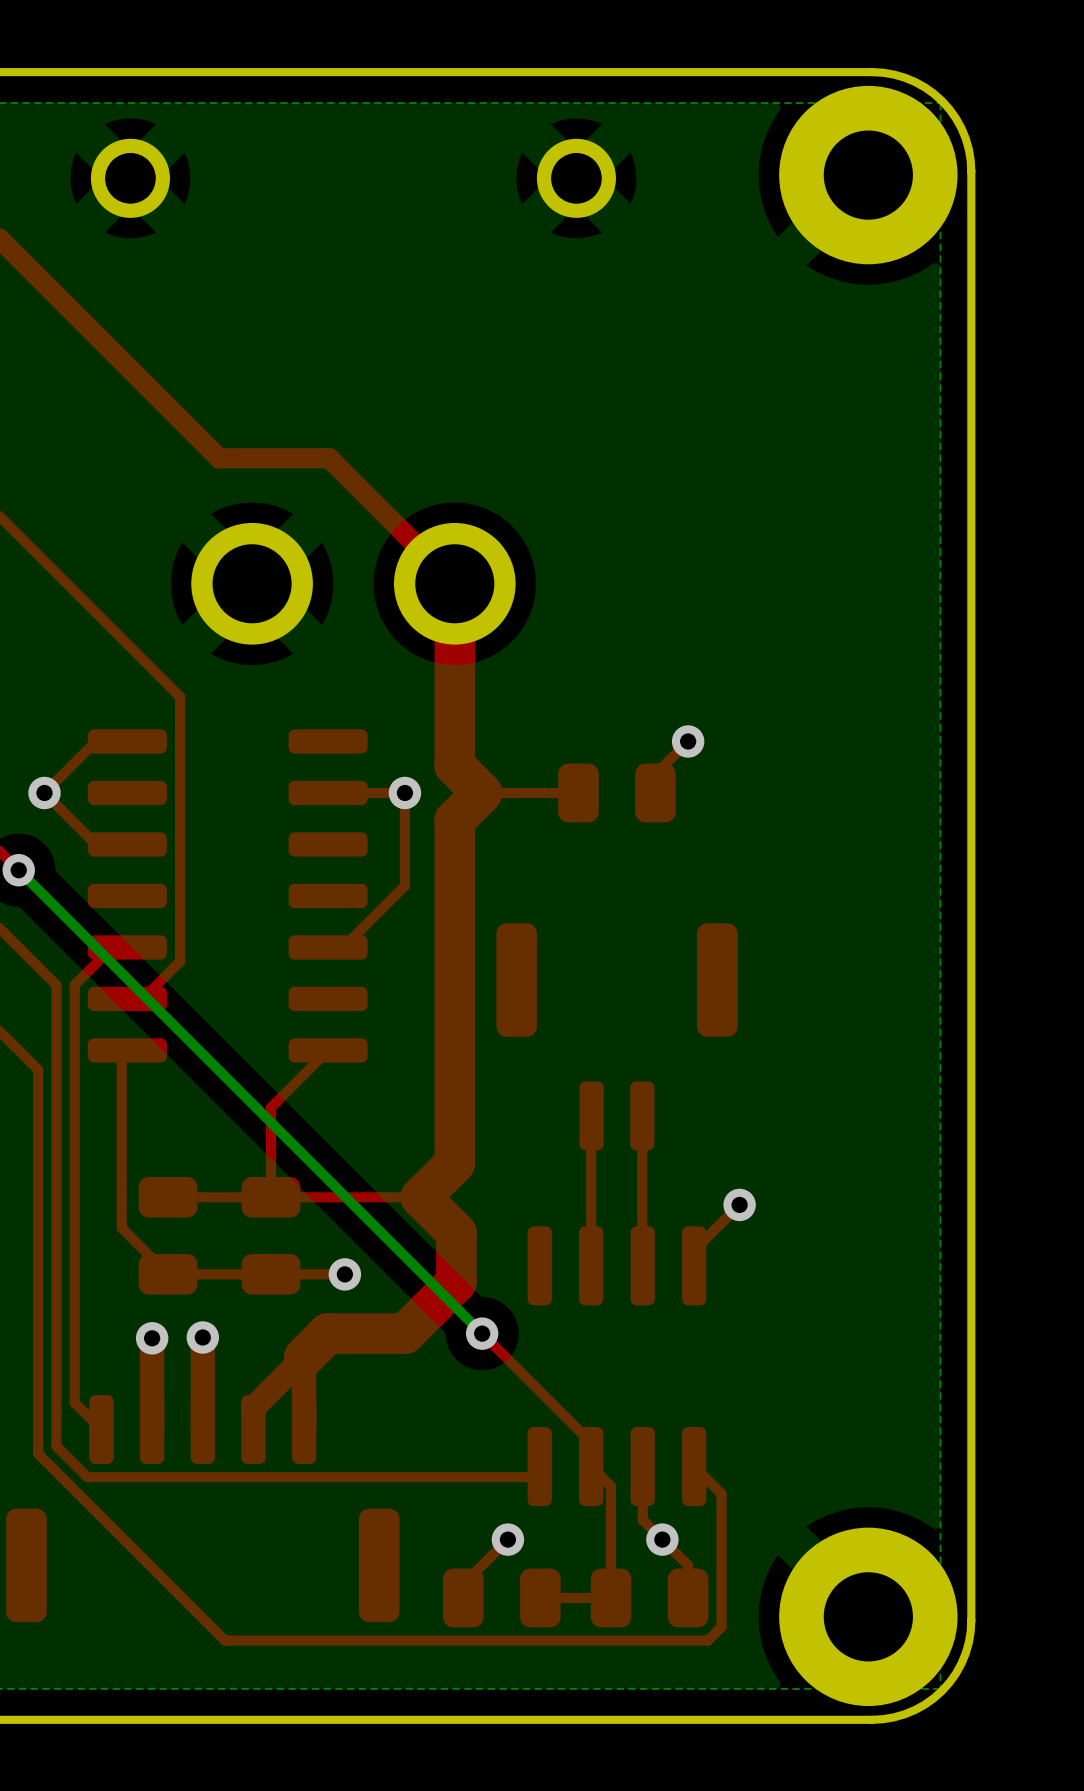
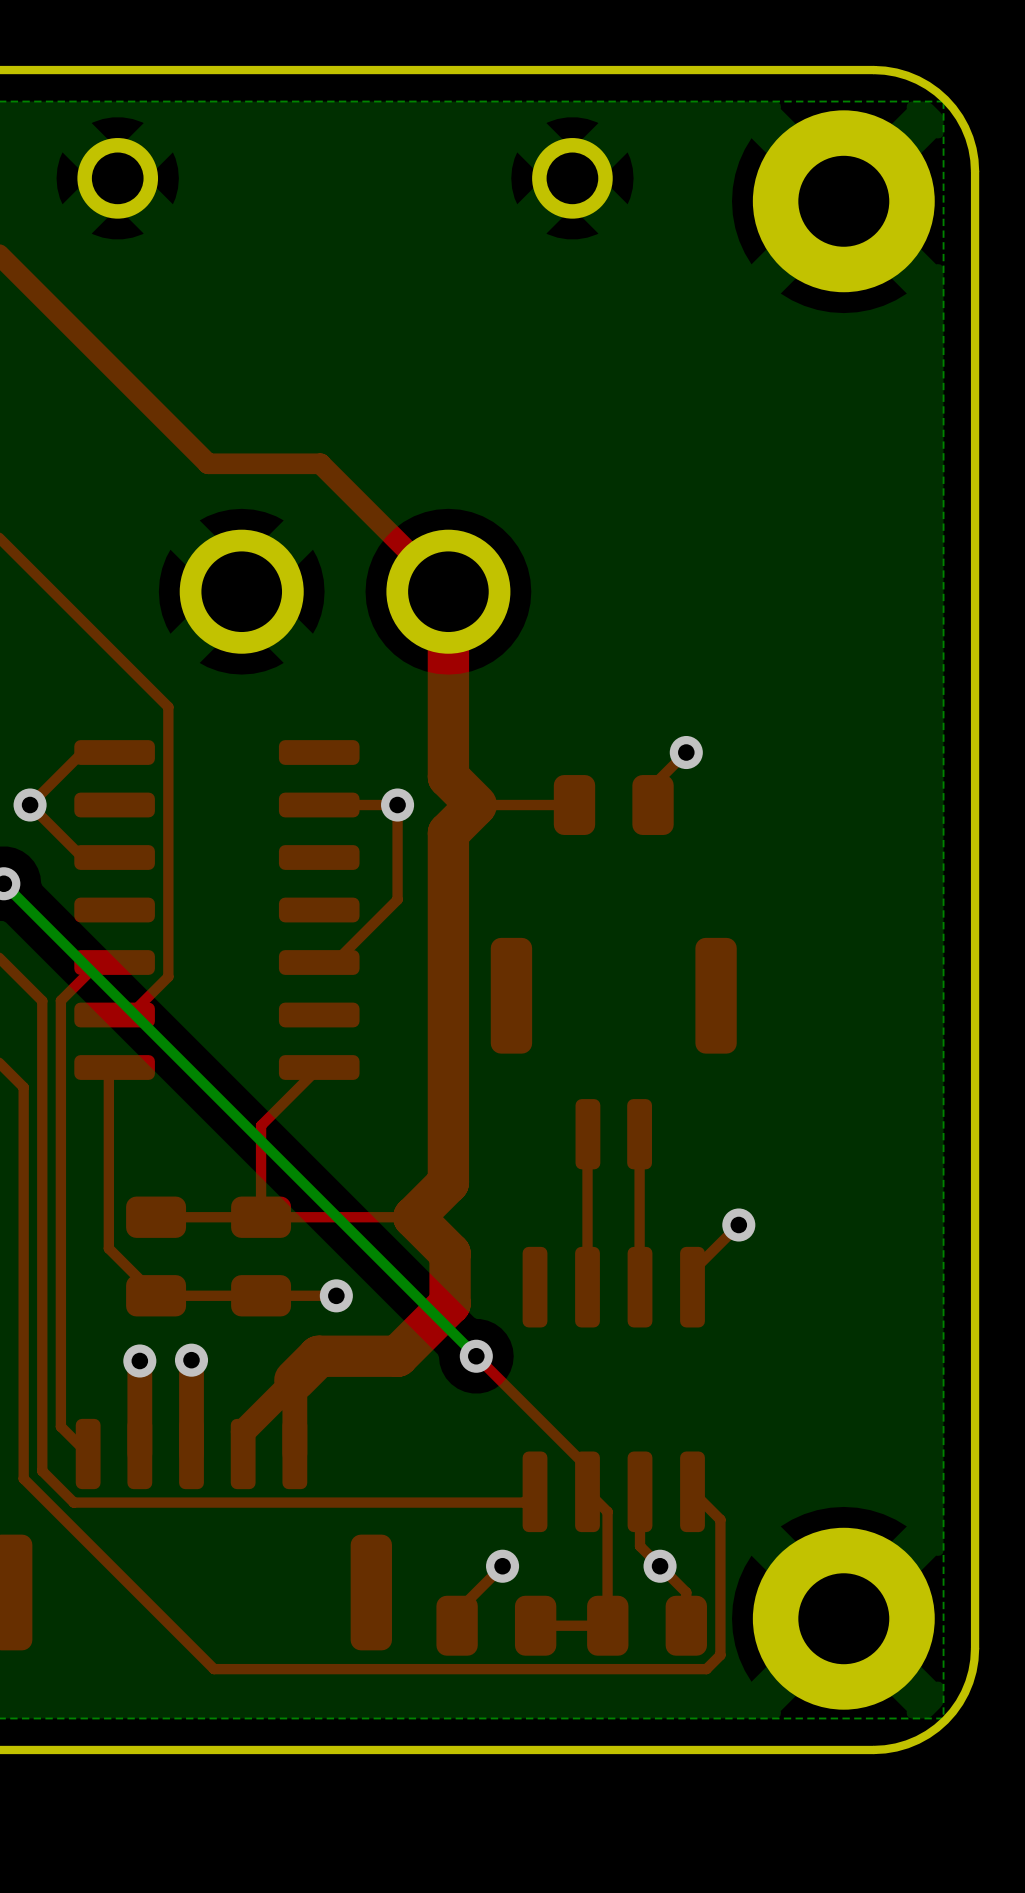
part position: (868, 175) -> (843, 201)
part position: (868, 1616) -> (843, 1618)

